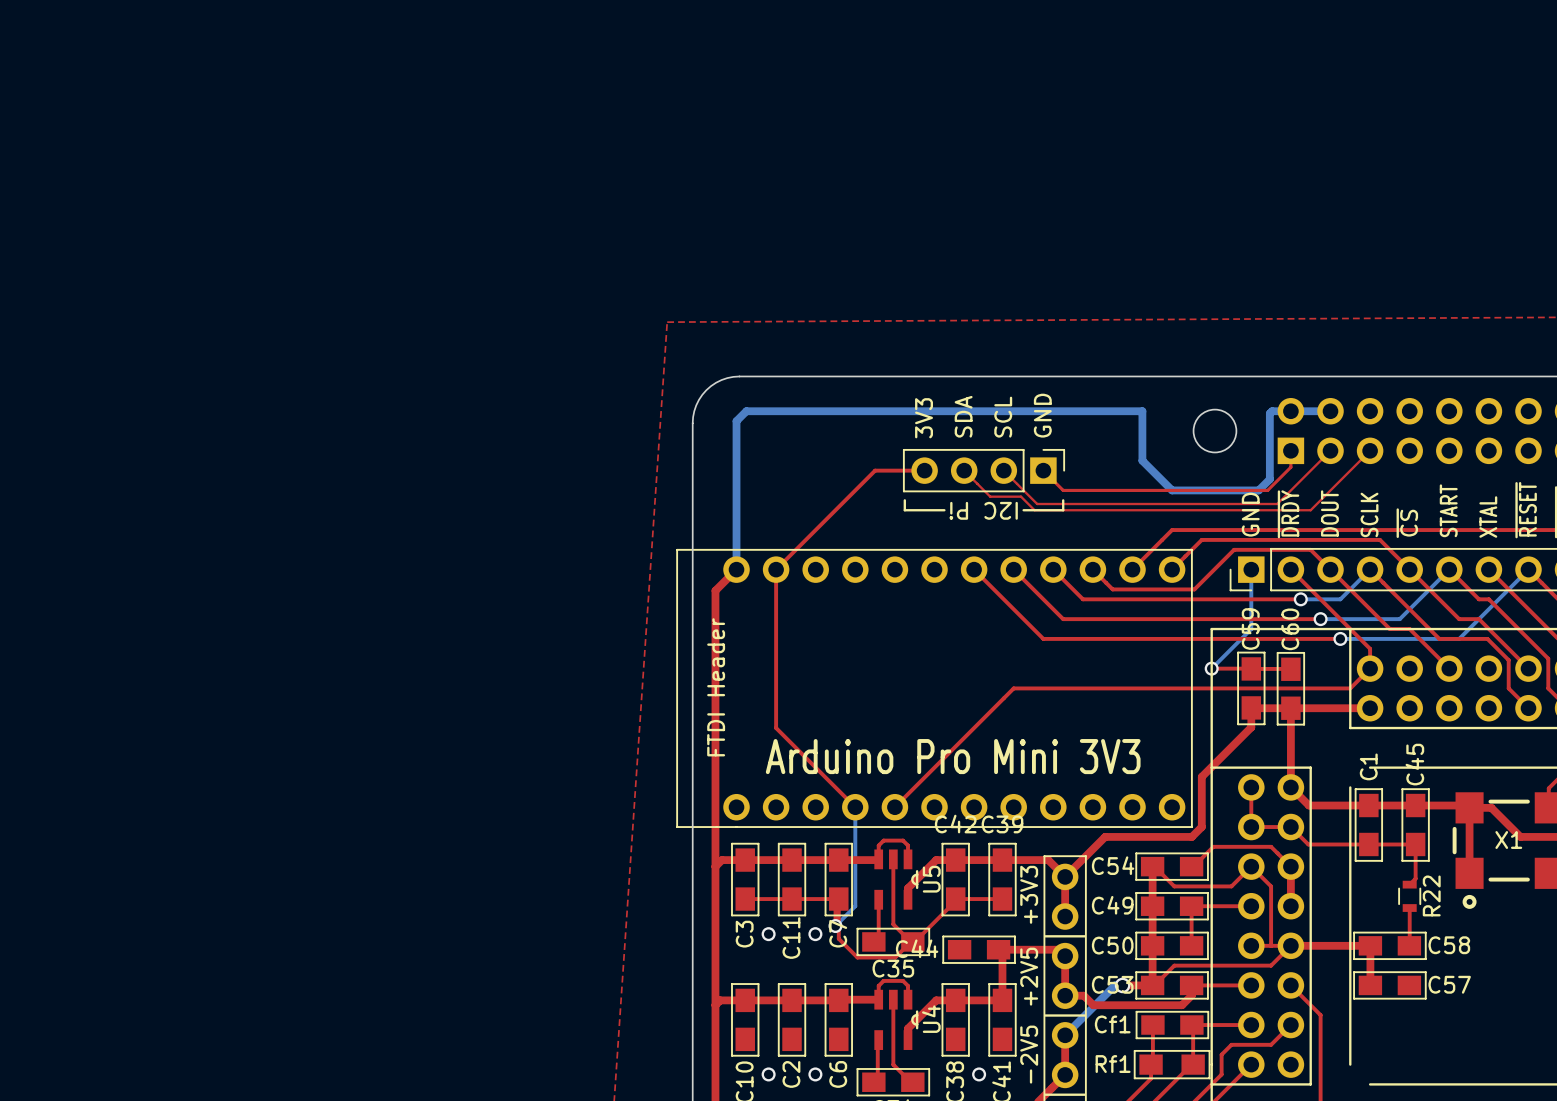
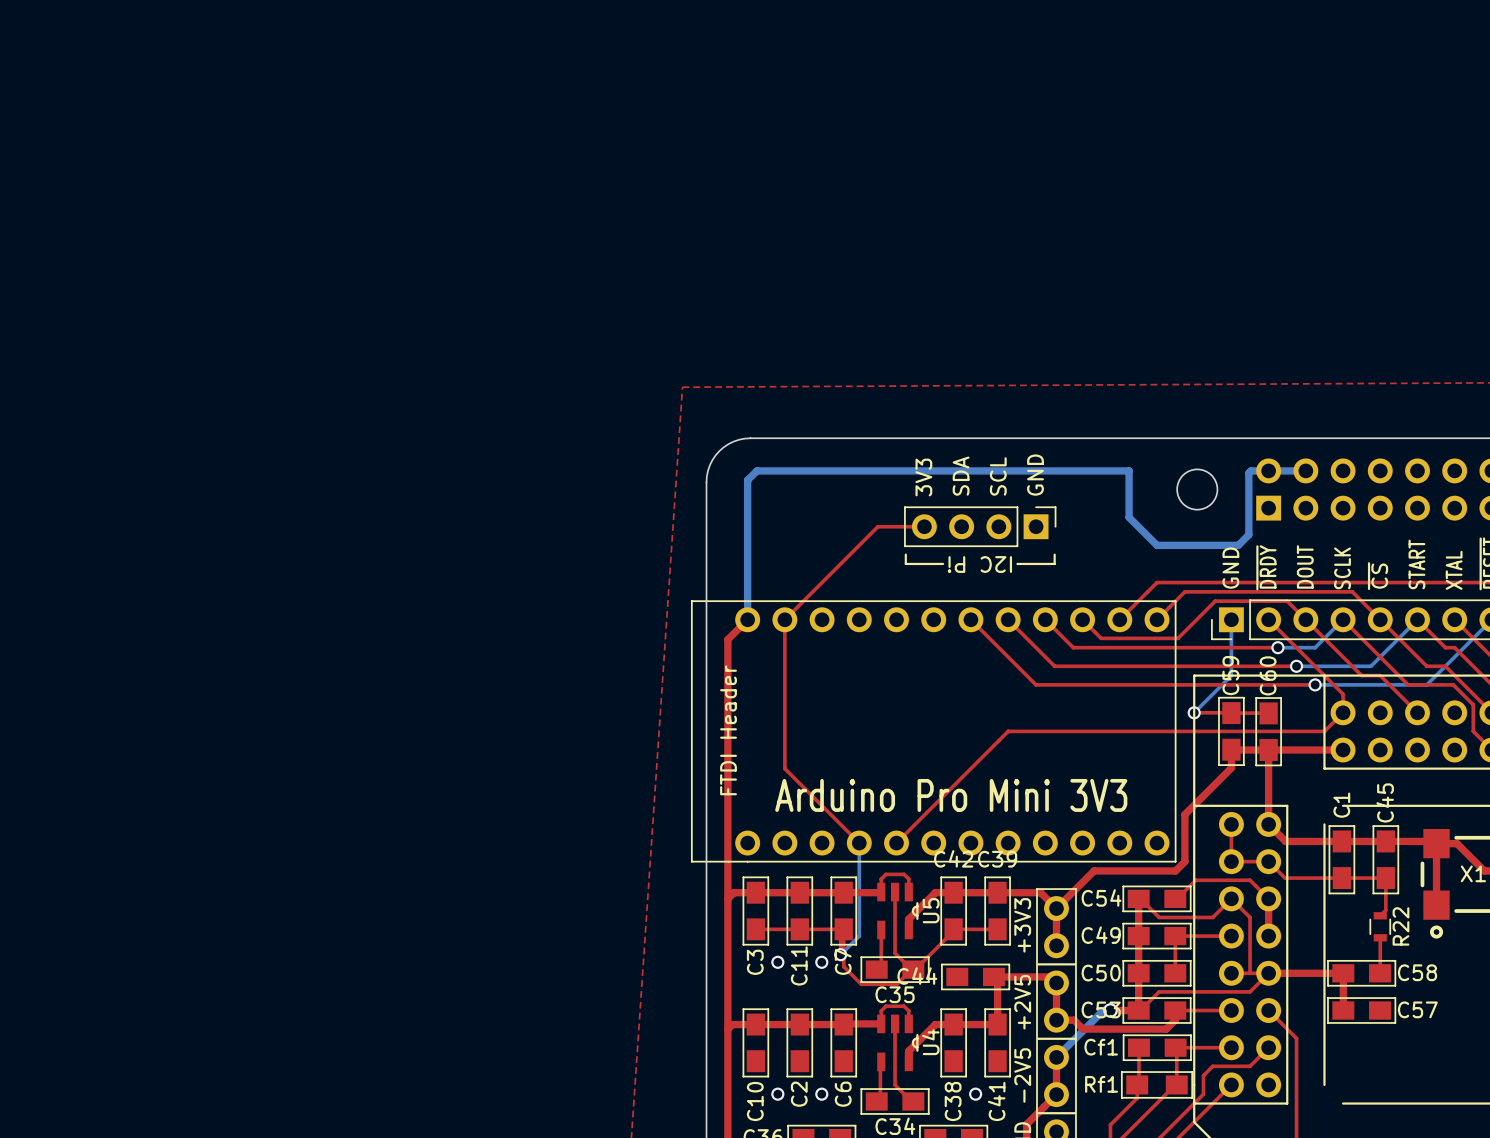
top track: (1290, 450) (1290, 467) (1267, 490) (1063, 490) (1043, 470) -> none
top track: (1330, 450) (1277, 504) (1037, 504) (1003, 470) -> none
top track: (1370, 450) (1310, 510) (1034, 510) (1021, 496) (990, 496) (964, 470) -> none

